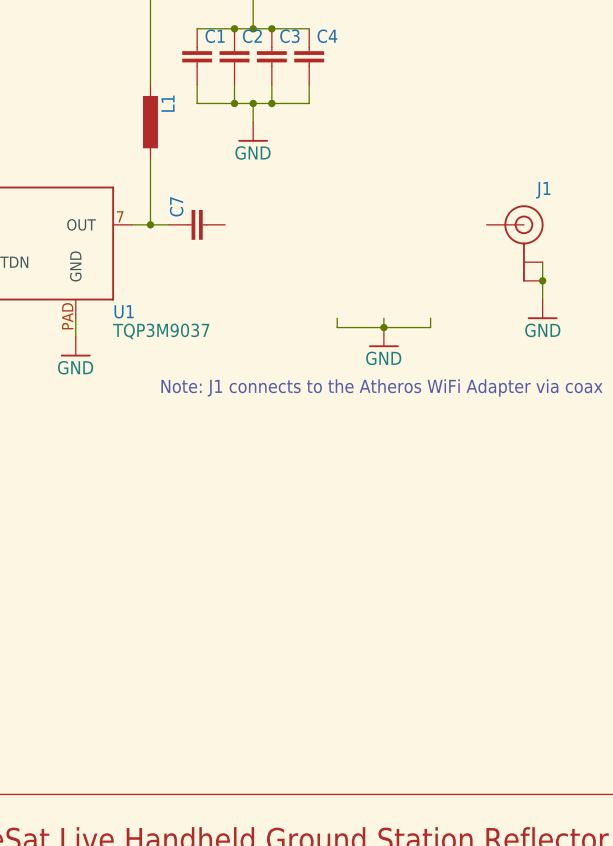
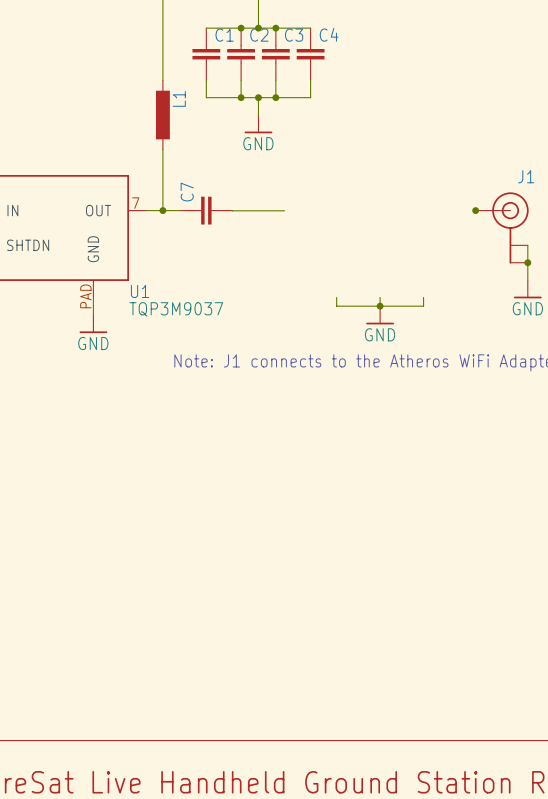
wire: none -> (232, 210) (284, 210)
junction: none -> (475, 210)

